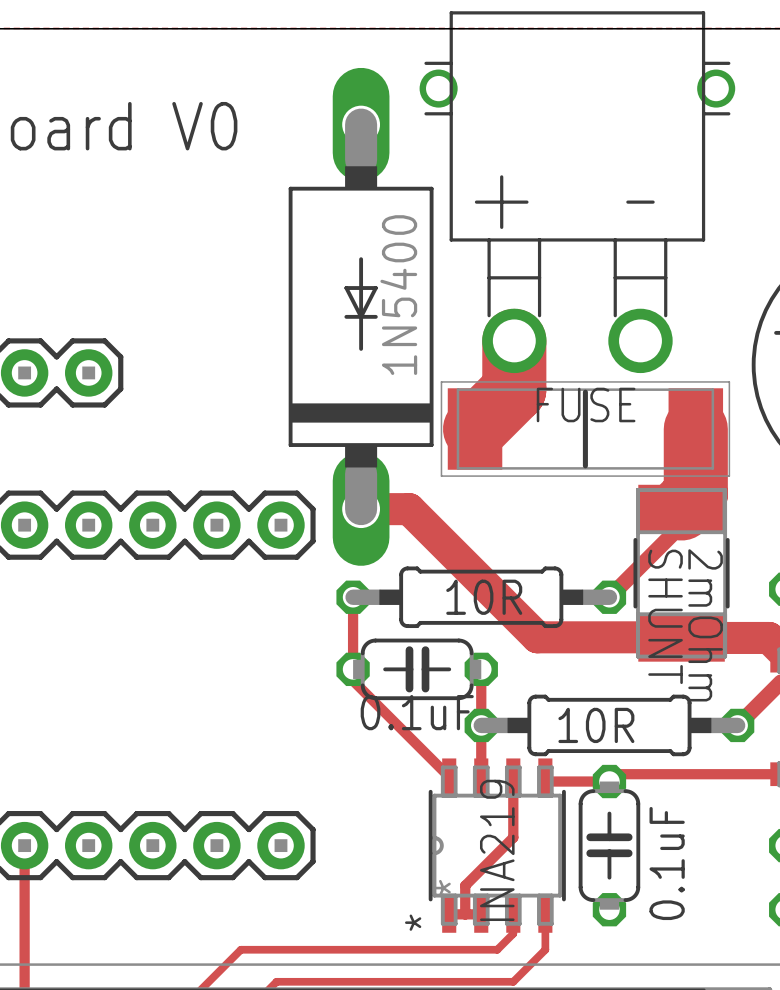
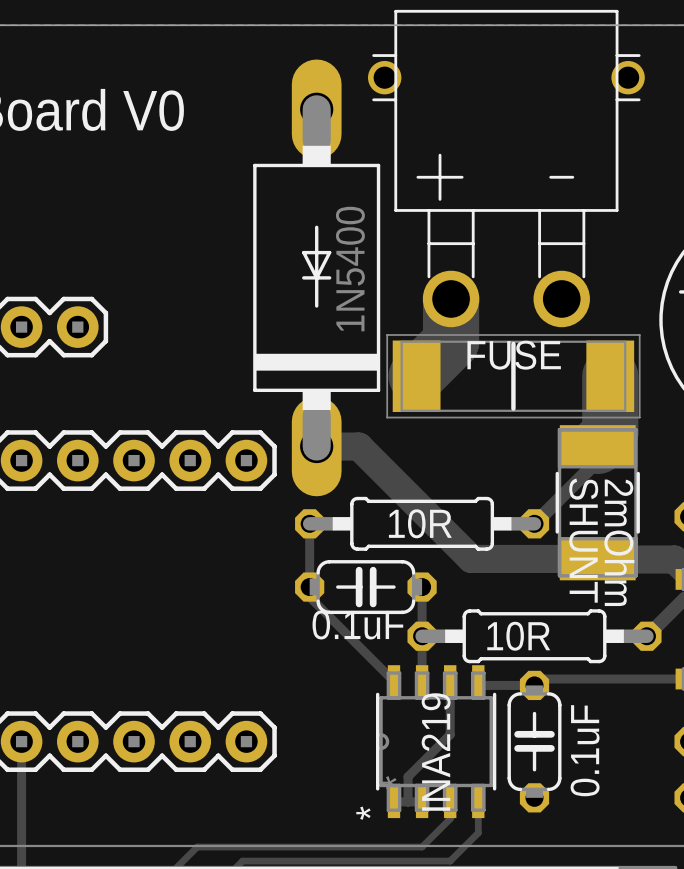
track: (497, 949) (240, 949) (224, 965) -> (436, 832) (422, 847) (197, 847)

